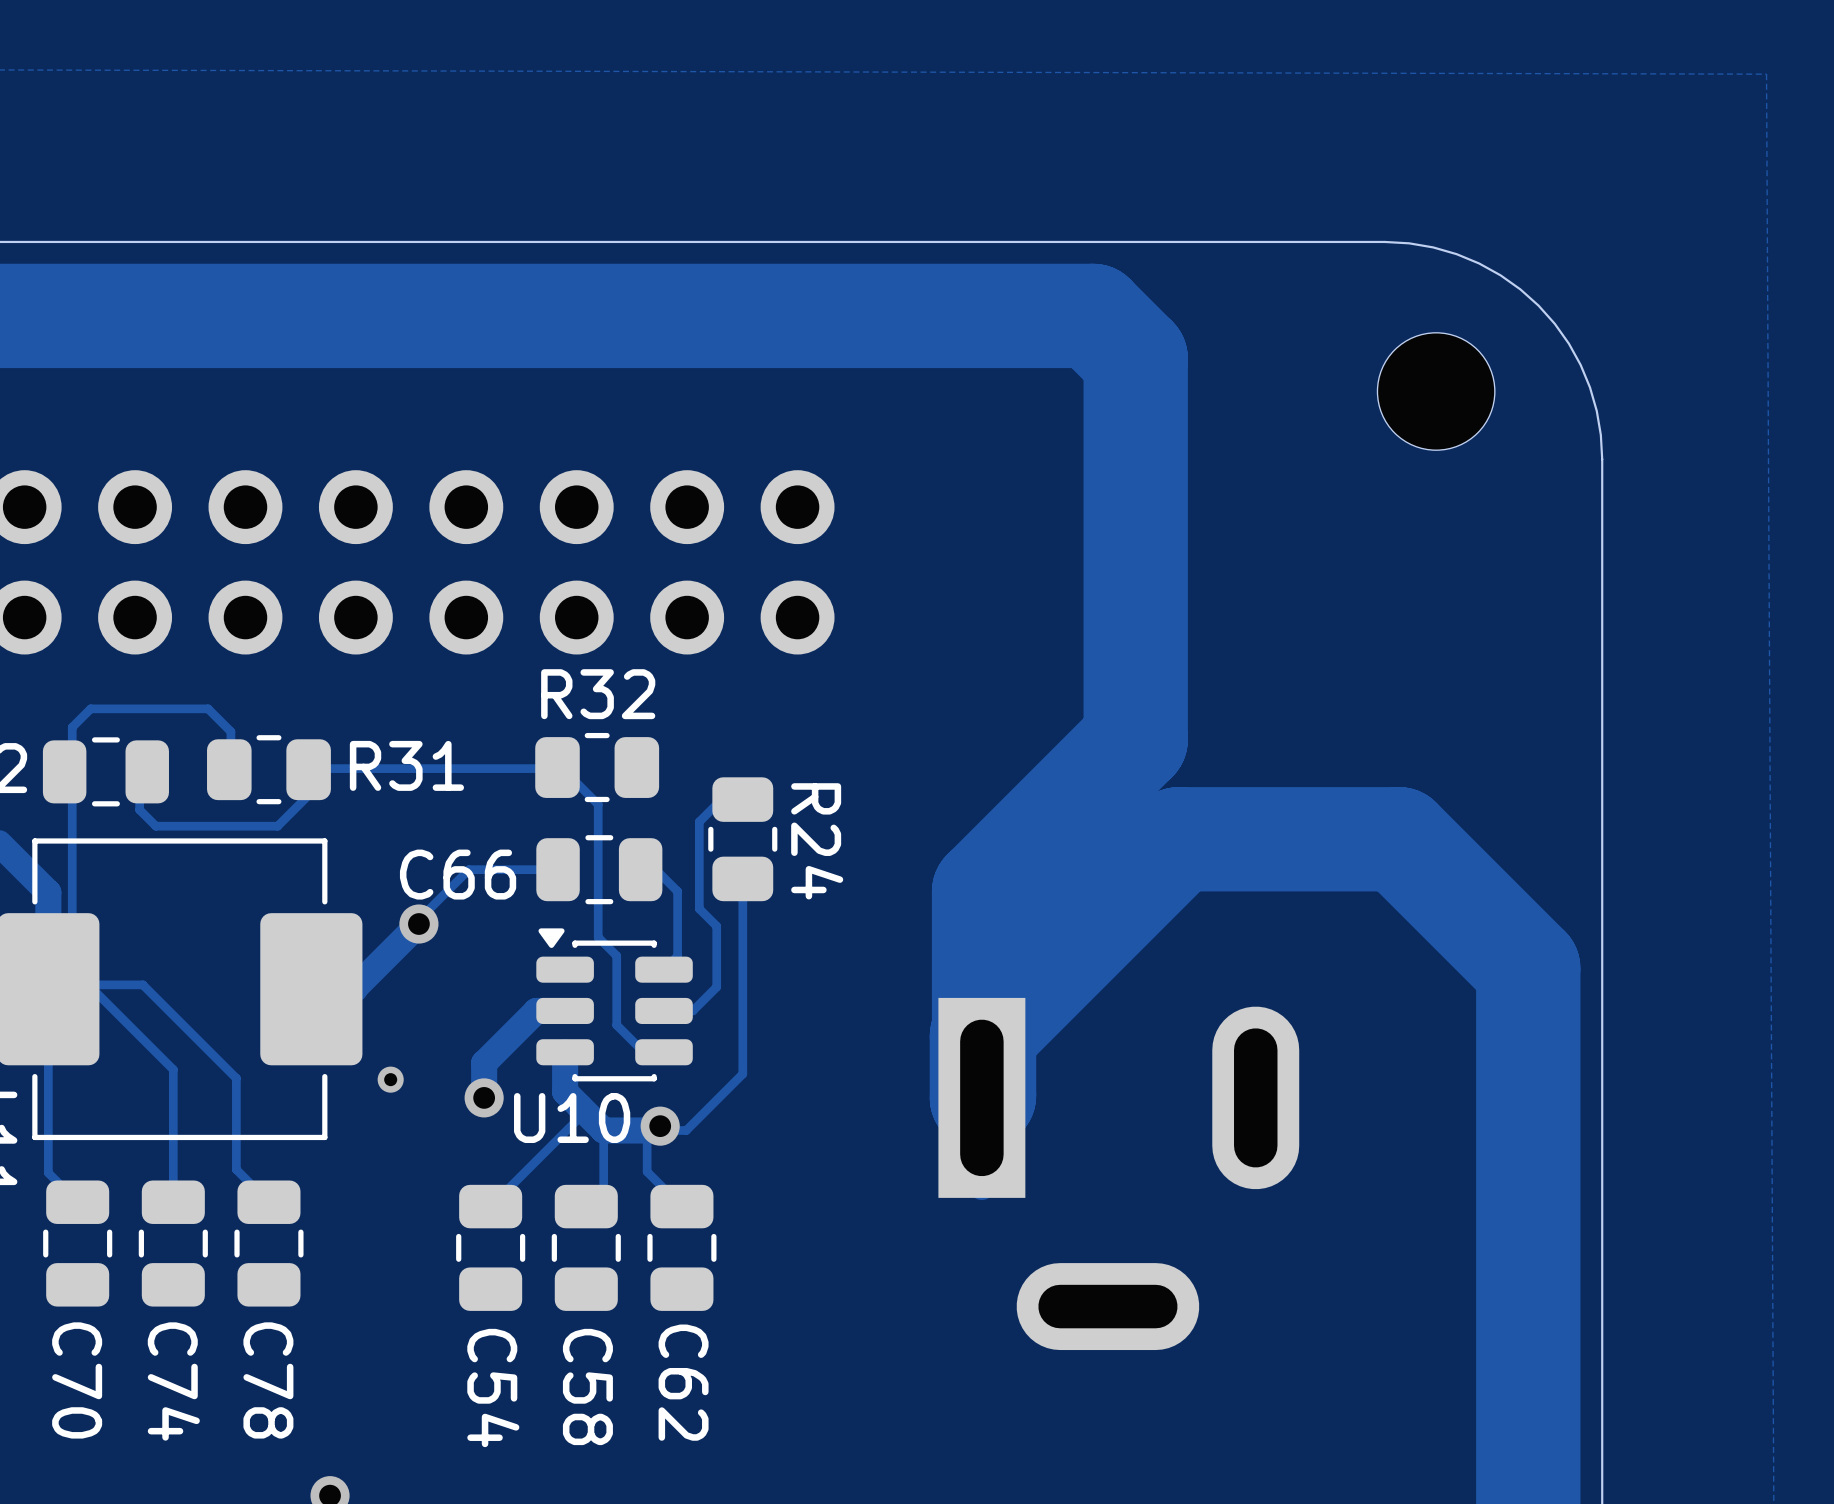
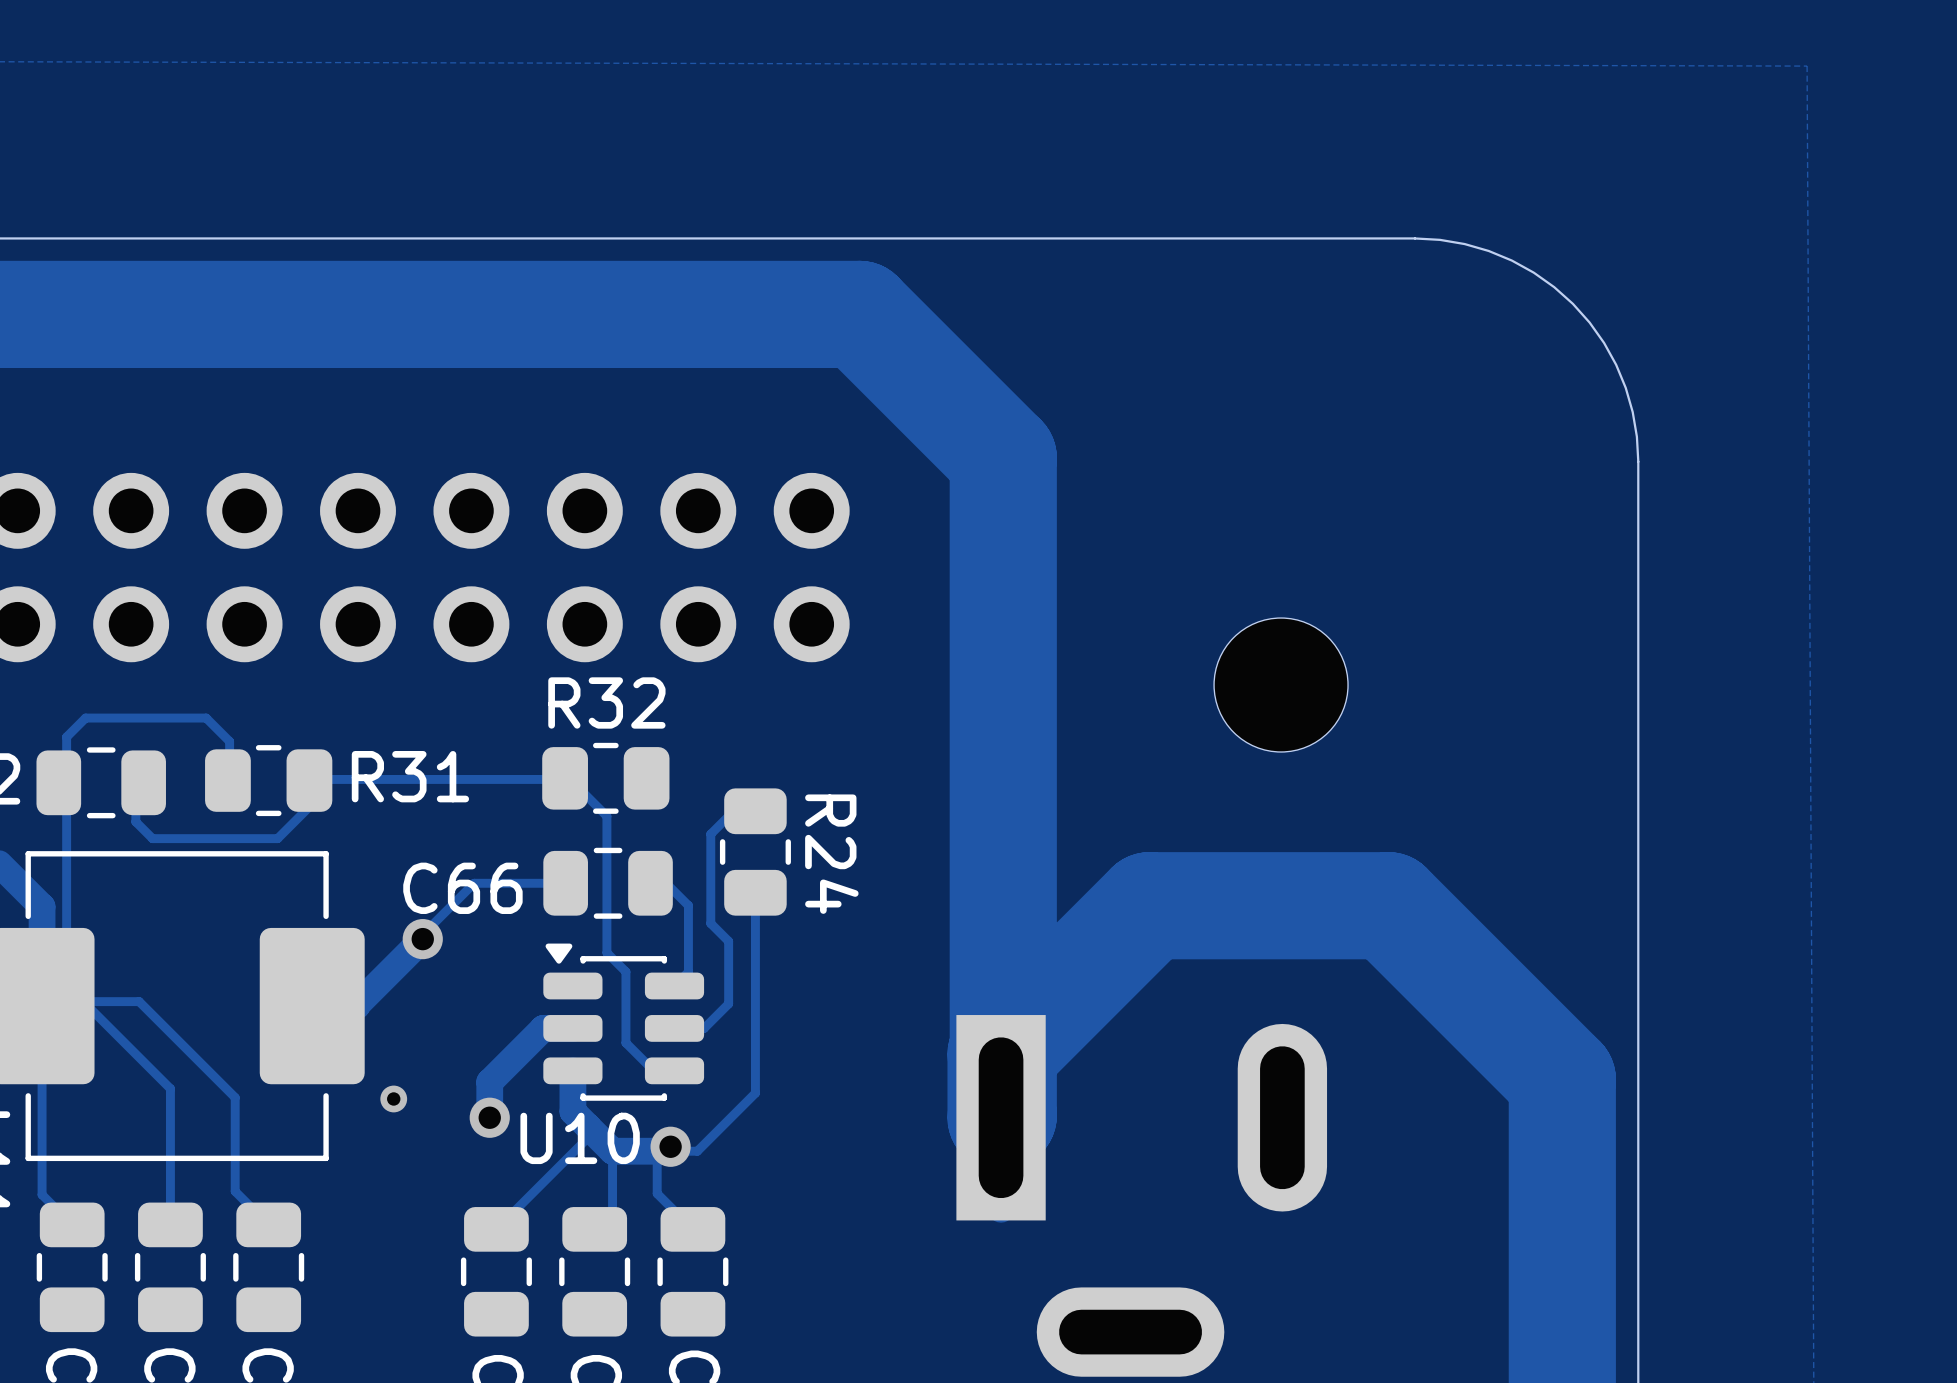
track: (844, 315) (1093, 315) (1135, 358) (1135, 739) (984, 891) -> (859, 314) (1003, 457) (1003, 905)
part: (1436, 391) -> none
part: none -> (1281, 685)
track: (1126, 891) (1178, 839) (1399, 839) (1528, 968) (1528, 1060) -> (1149, 905) (1388, 905) (1562, 1079)

